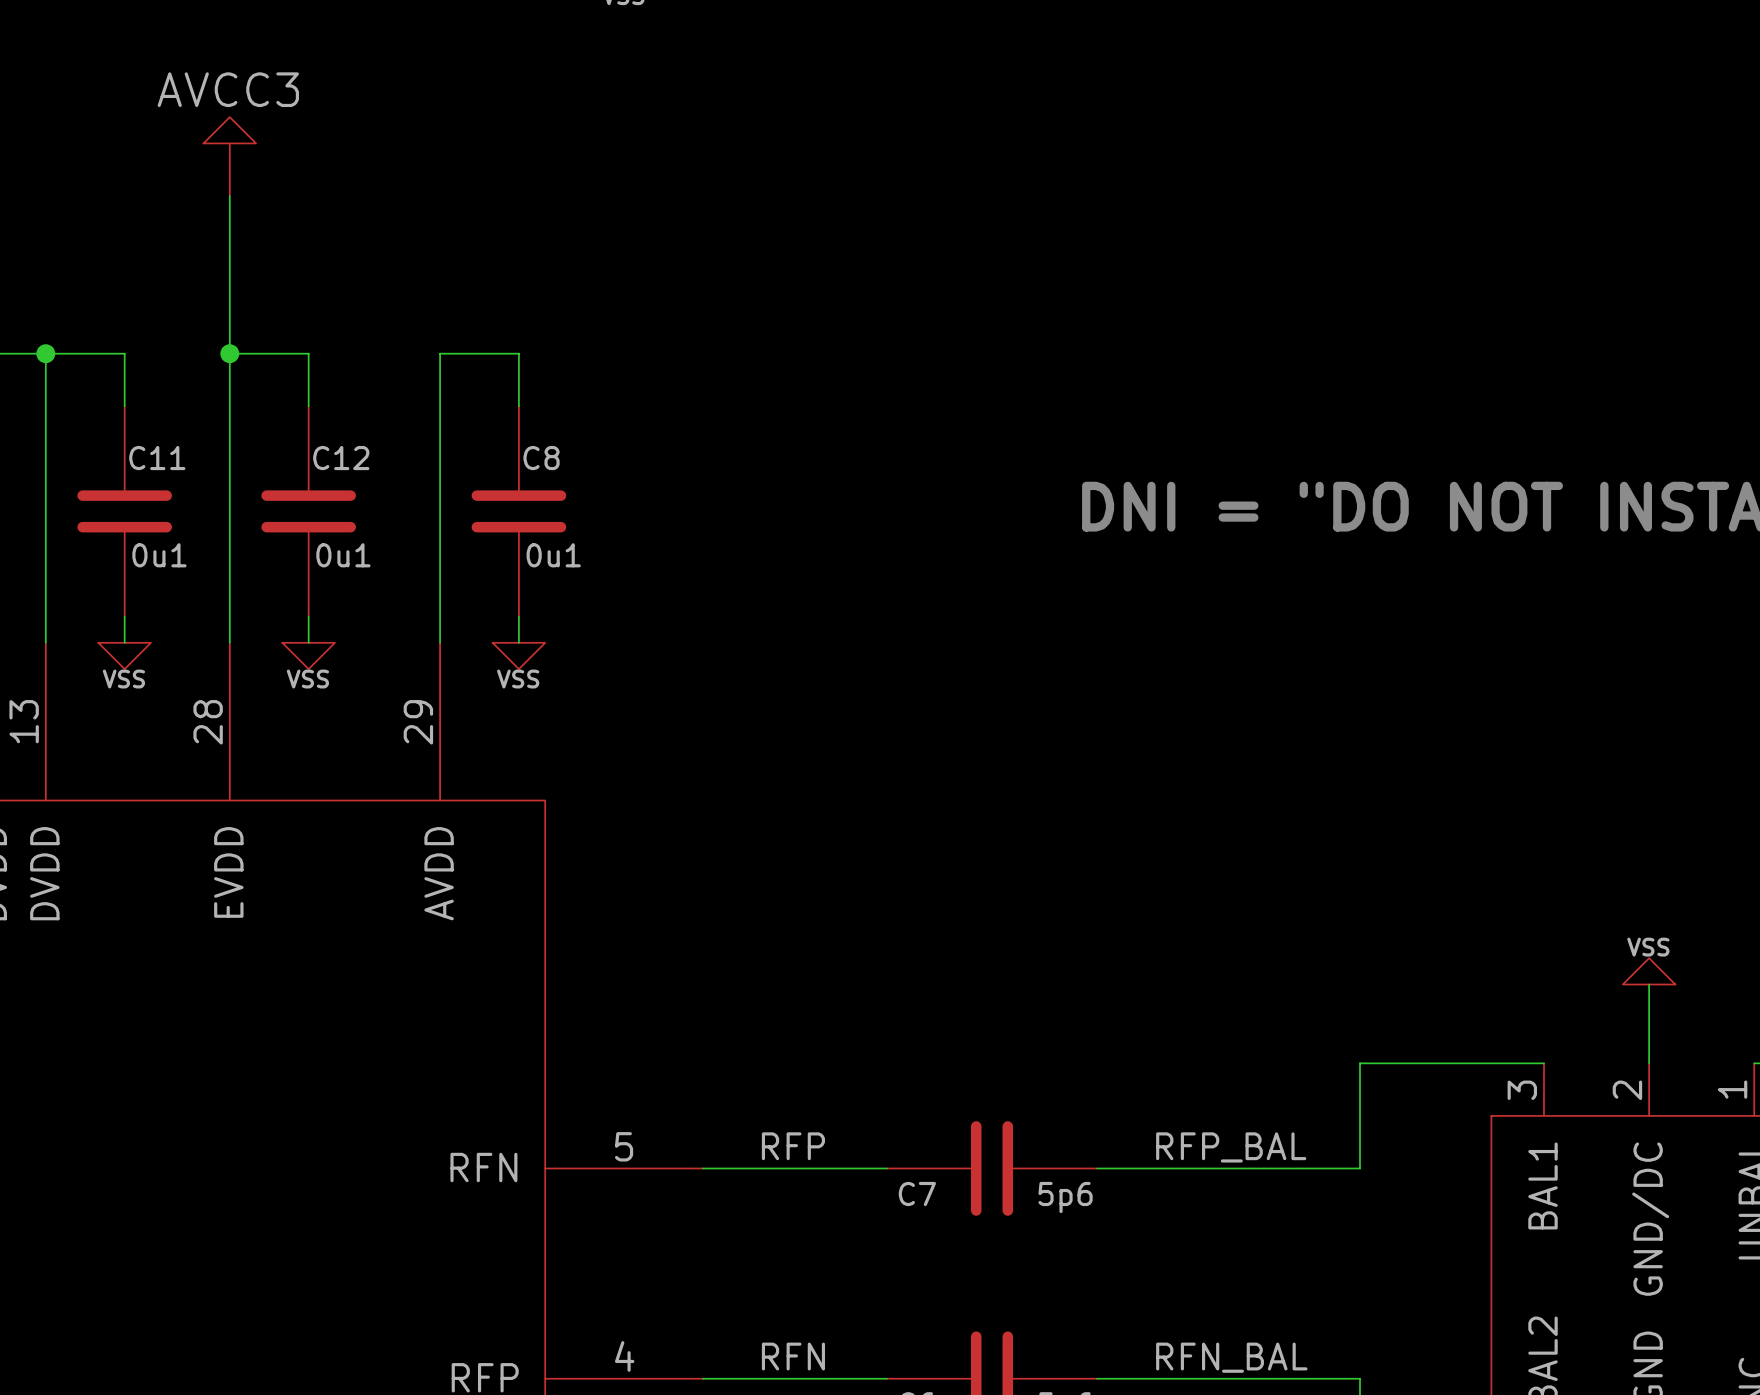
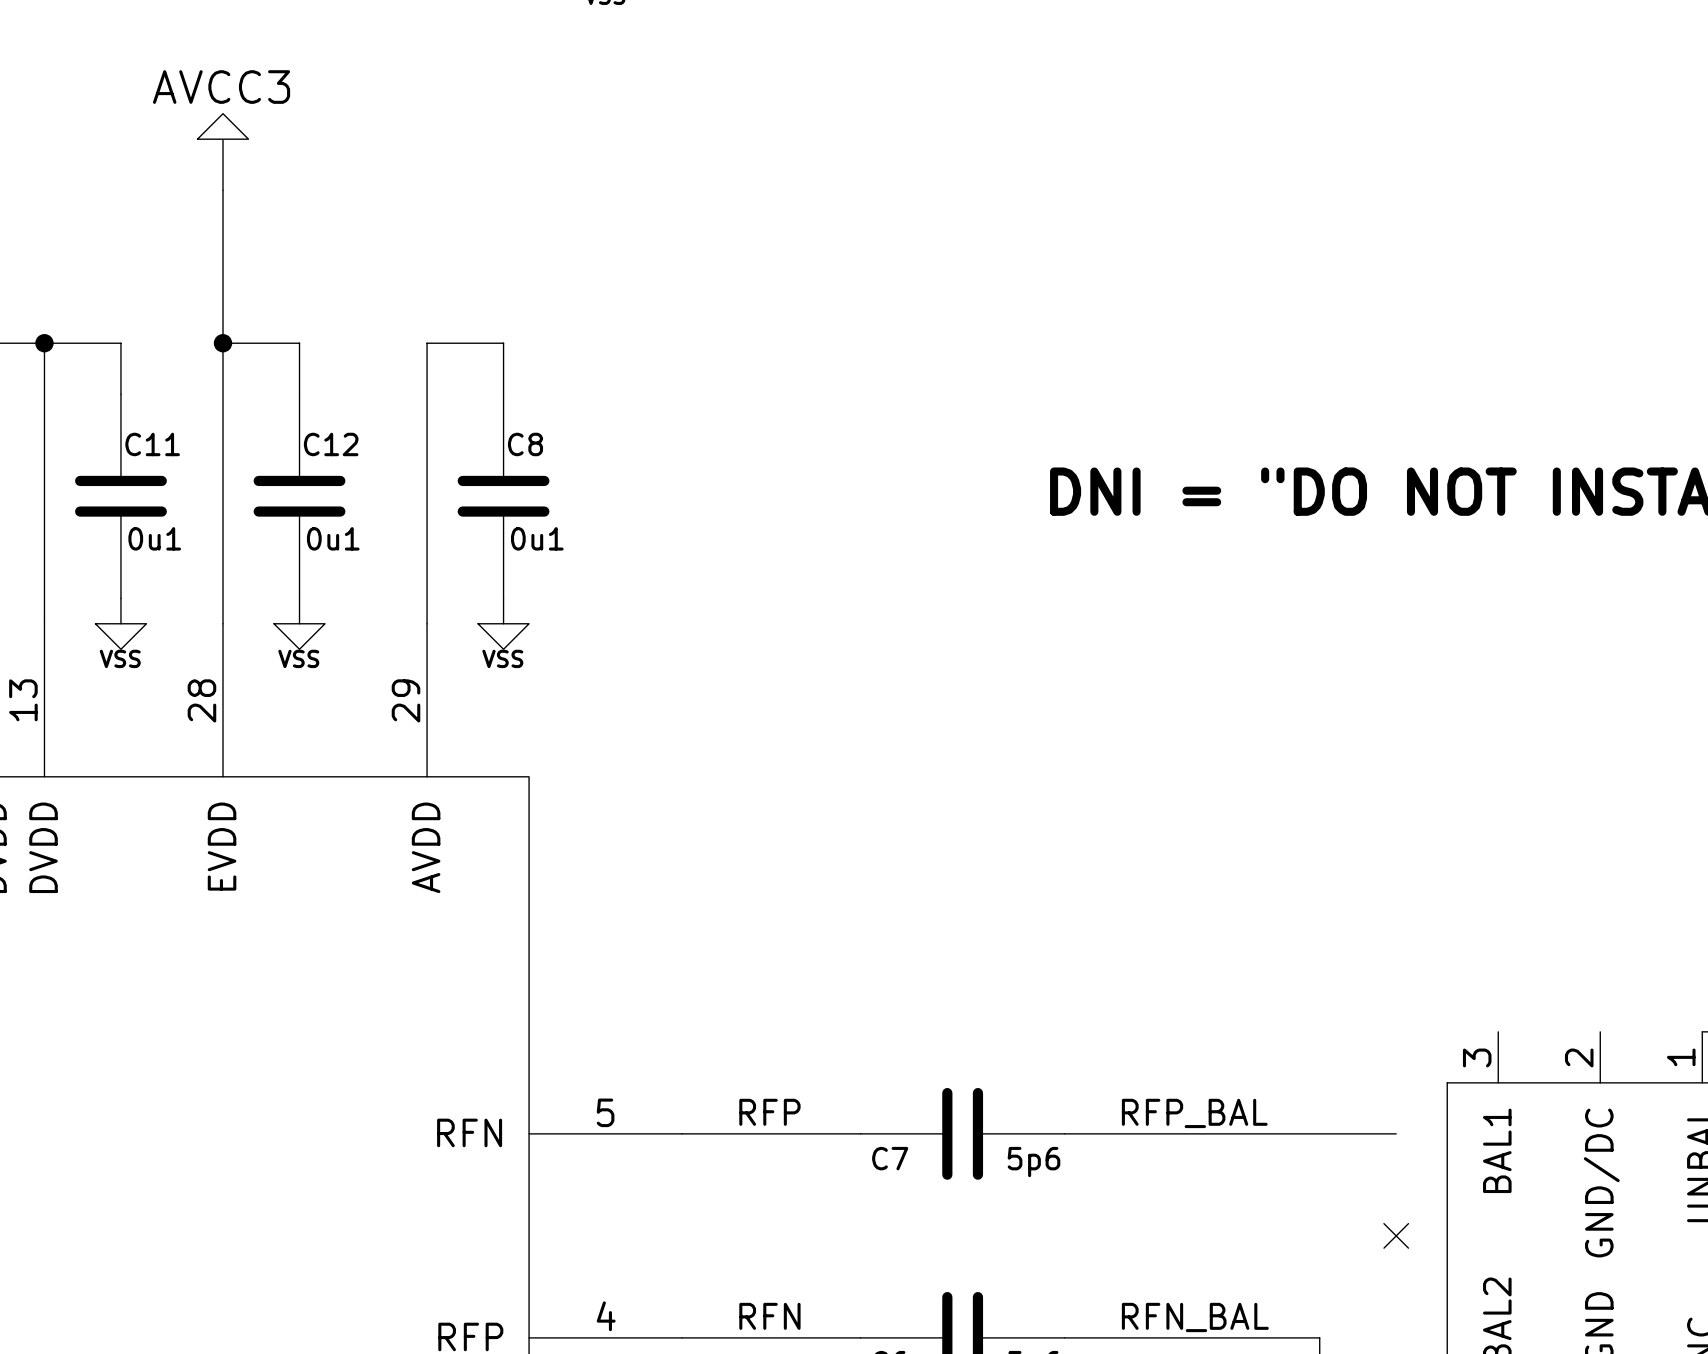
power symbol: VSS (1649, 971) -> none
wire: (1649, 984) (1649, 1063) -> none
wire: (1543, 1063) (1360, 1063) (1360, 1168) -> (1396, 1133) (1319, 1133)
no-connect mark: none -> (1396, 1235)

